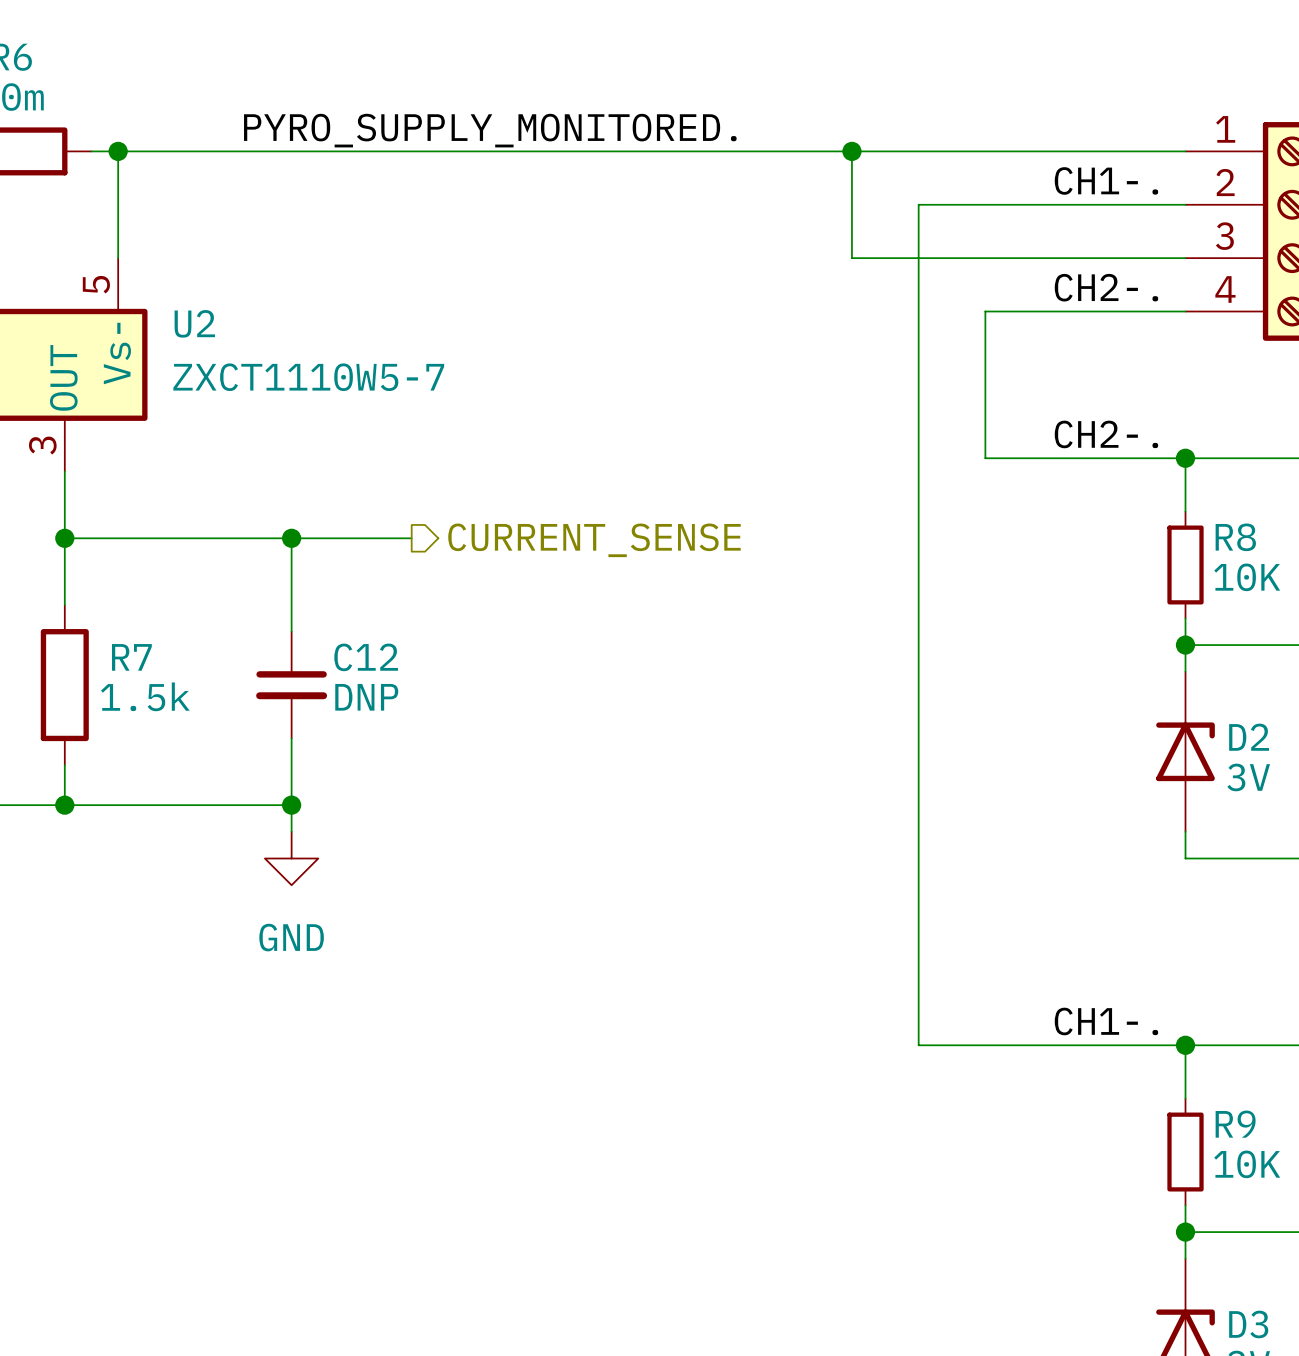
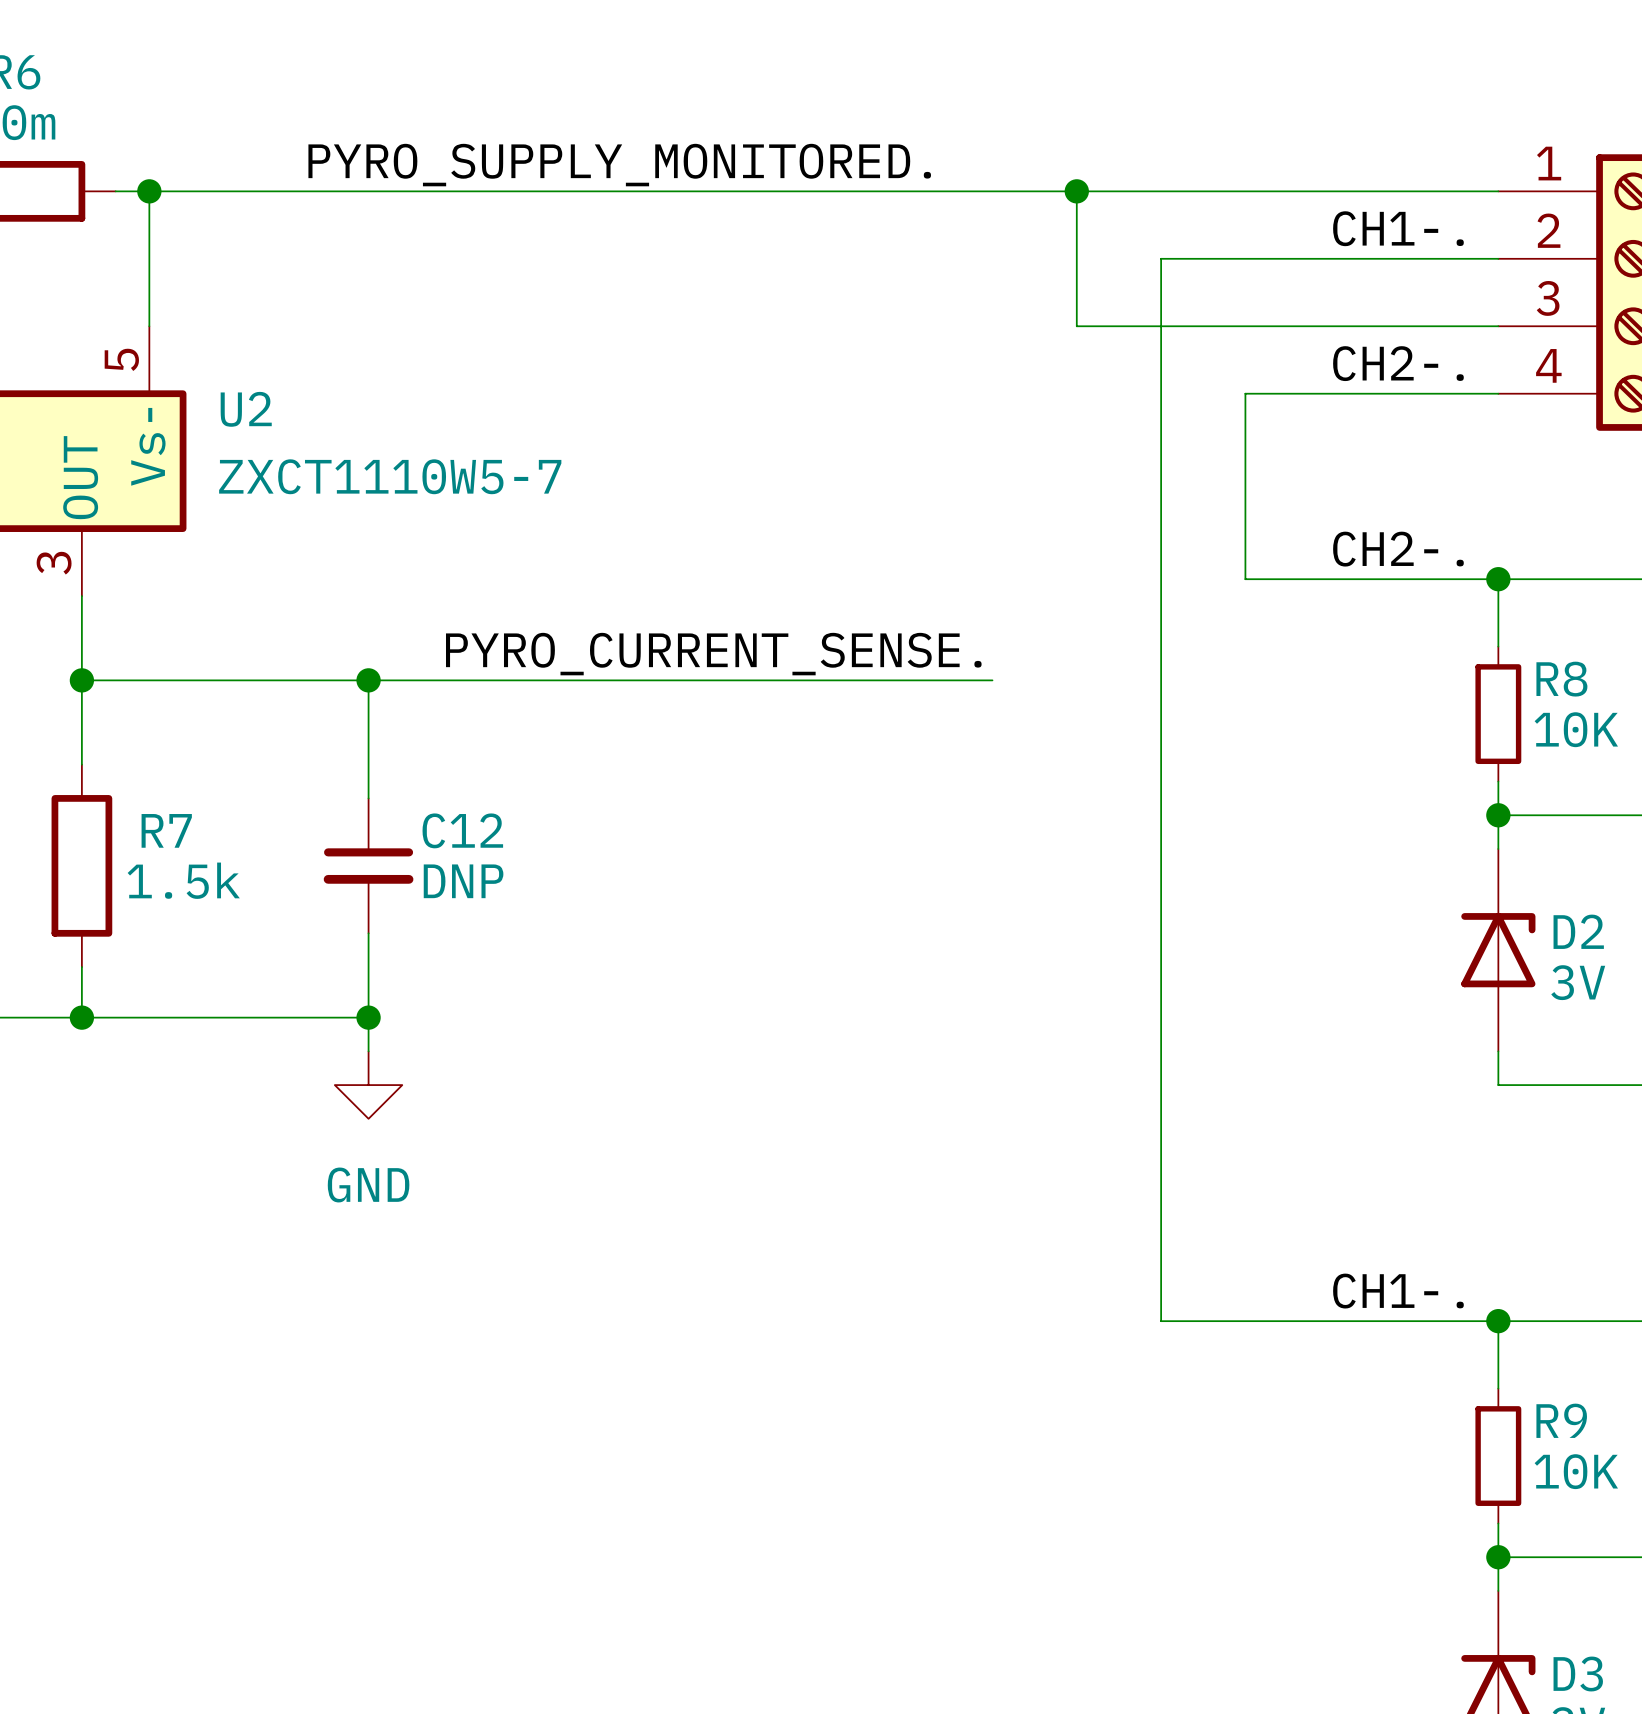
label: none -> PYRO_CURRENT_SENSE. (713, 654)
wire: none -> (520, 680) (992, 680)
hierarchical label: CURRENT_SENSE (594, 540) -> none

